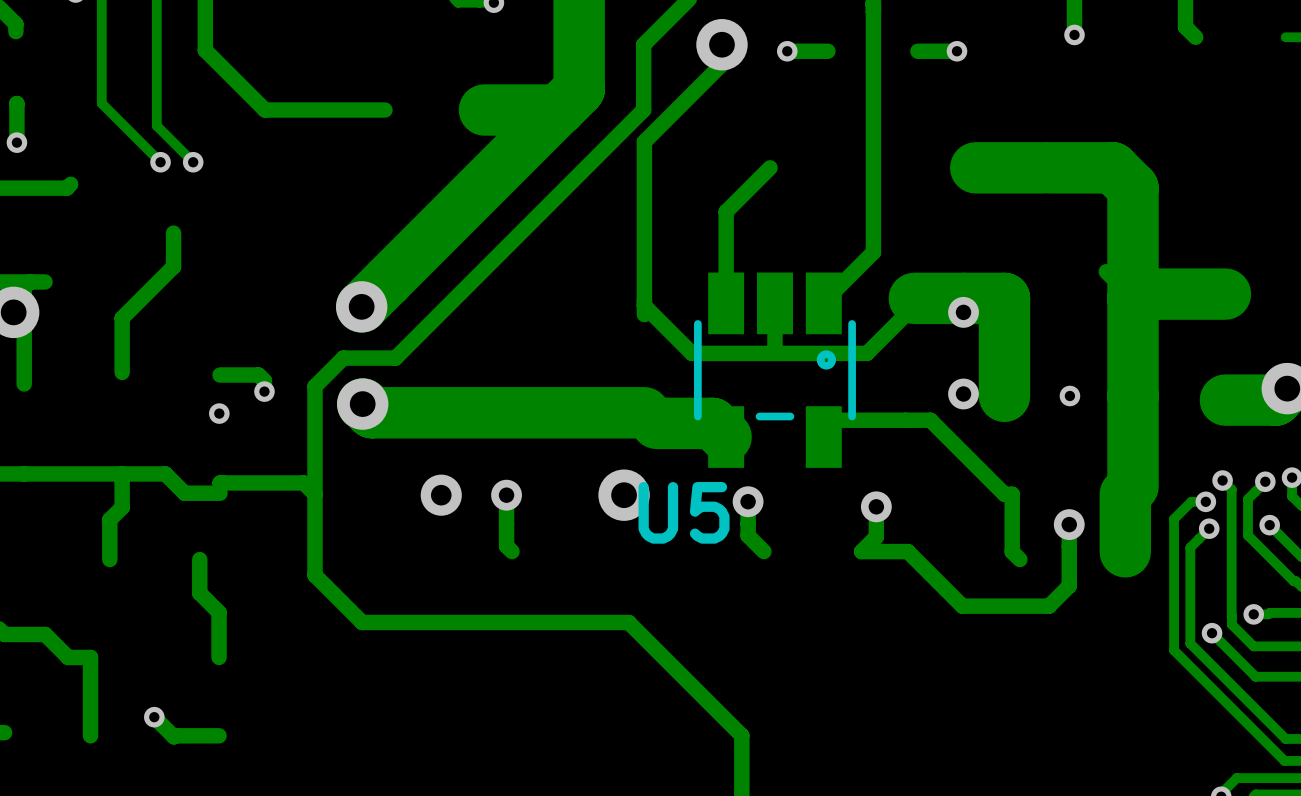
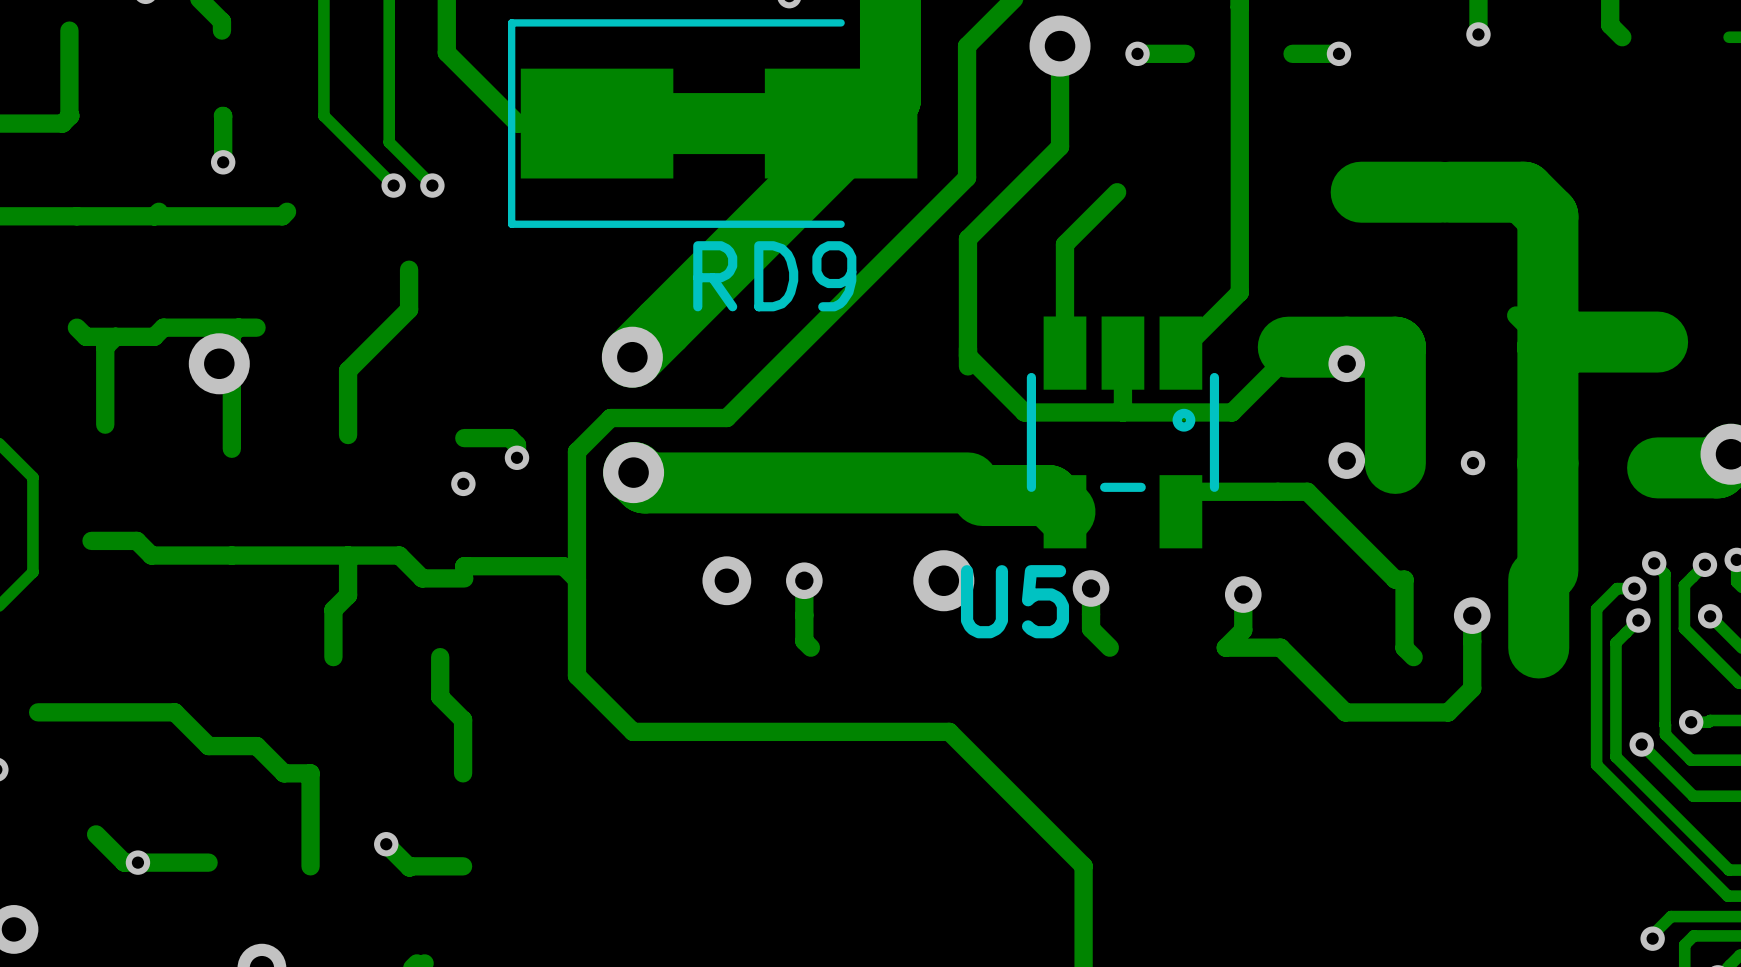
track: (721, 64) (644, 141) (644, 207) -> (1060, 69) (1060, 146) (967, 238)
RD9: none -> (712, 123)
track: (643, 110) (395, 358) -> (967, 123) (967, 177) (726, 418) (672, 418)

